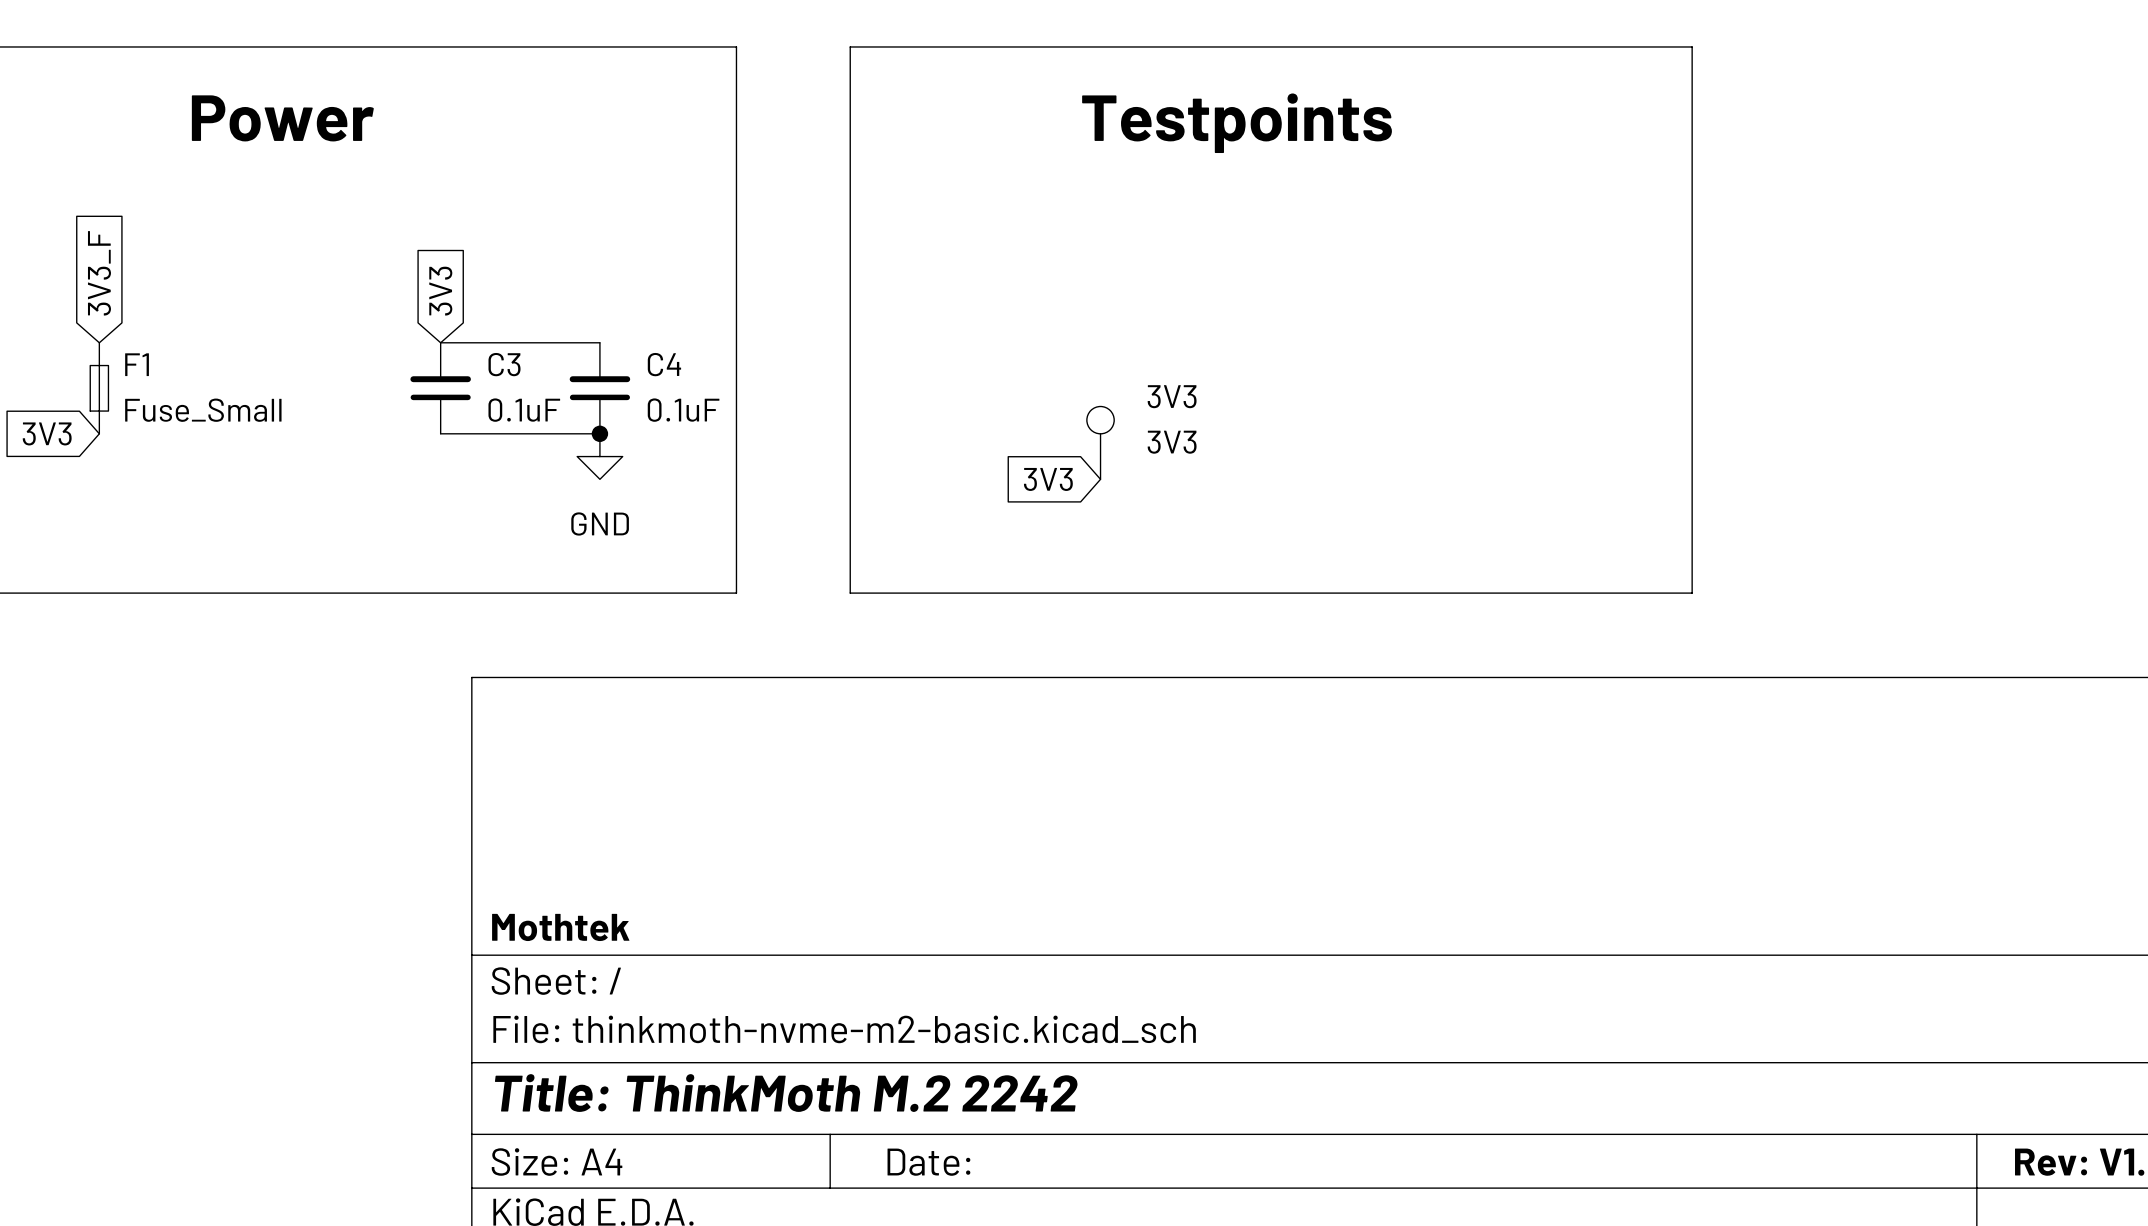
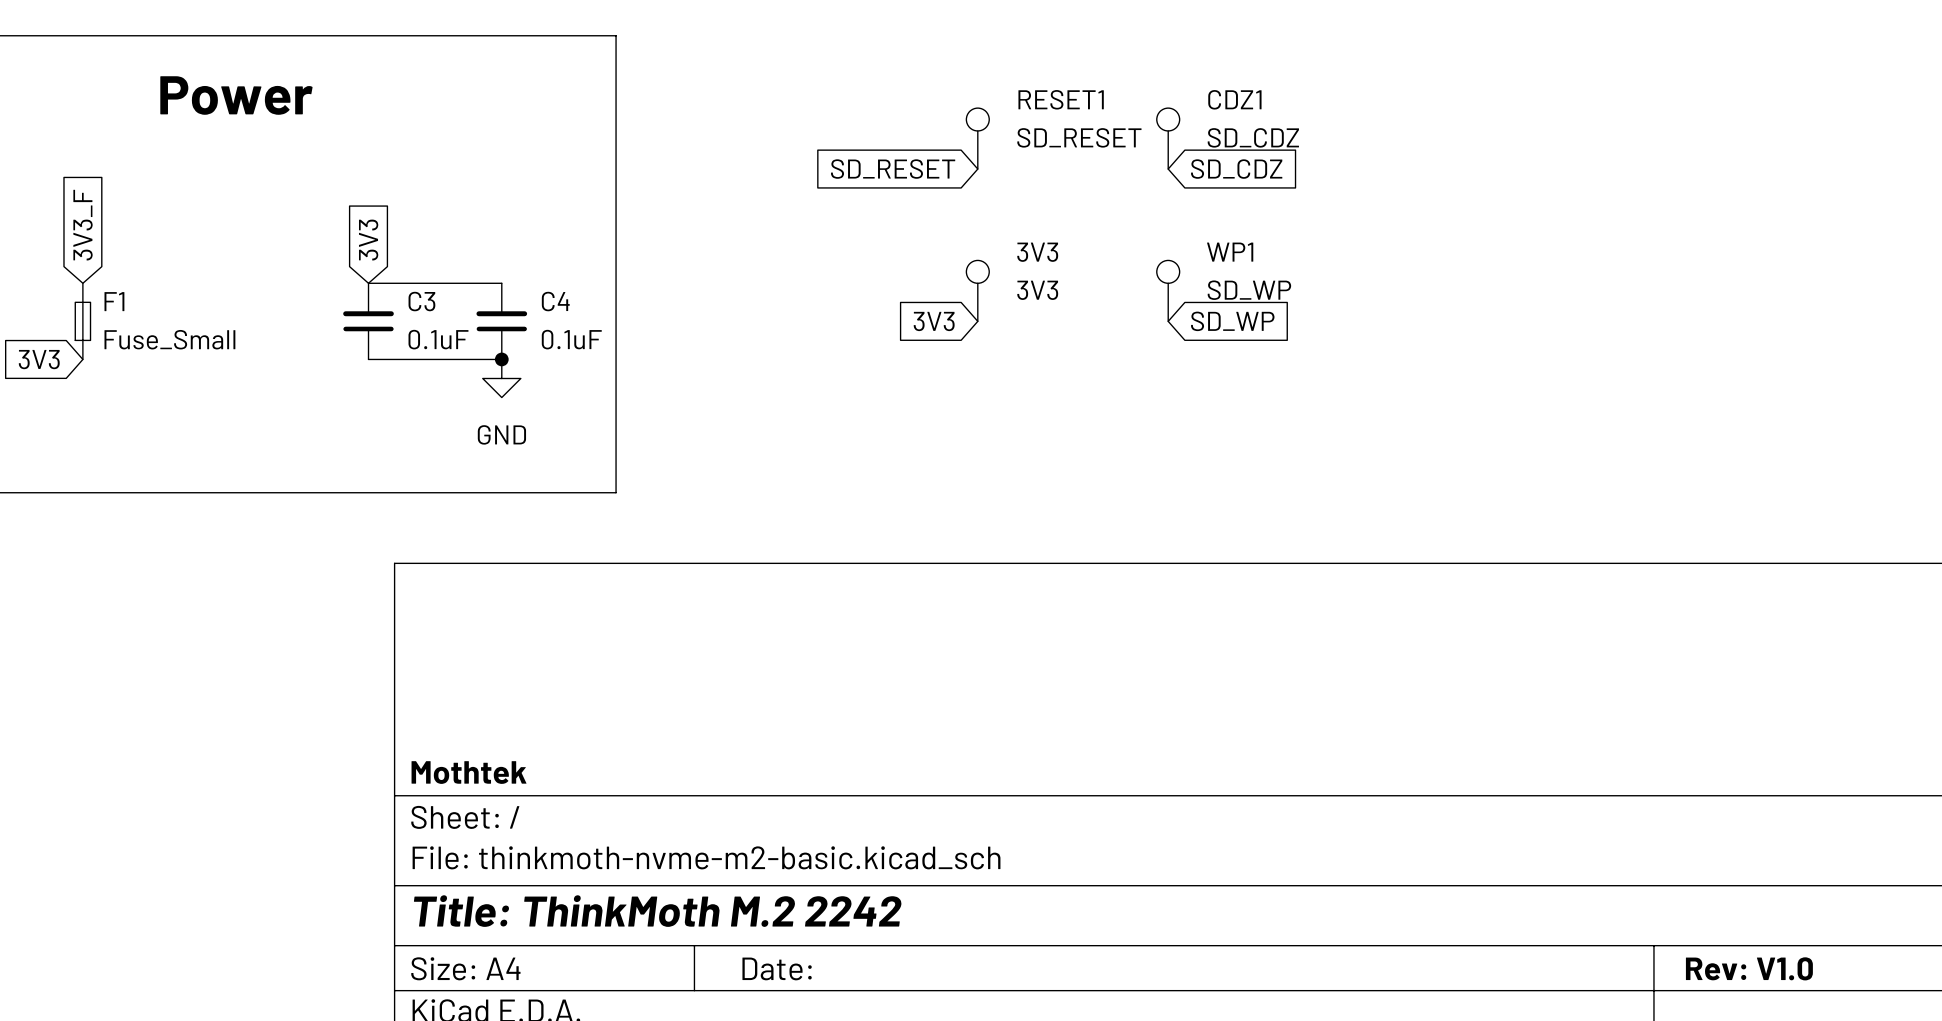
line: (850, 46) (1692, 46) (1692, 593) (850, 593) (850, 46) -> none
text: Testpoints (1237, 123) -> none
RESET1: none -> SD_RESET (977, 138)
CDZ1: none -> SD_CDZ (1168, 138)
global label: none -> SD_RESET (893, 169)
global label: none -> SD_CDZ (1236, 169)
WP1: none -> SD_WP (1168, 290)
global label: none -> SD_WP (1232, 321)
3V3 position: (1100, 442) -> (977, 290)
global label position: 3V3 (1048, 479) -> 3V3 (934, 321)

